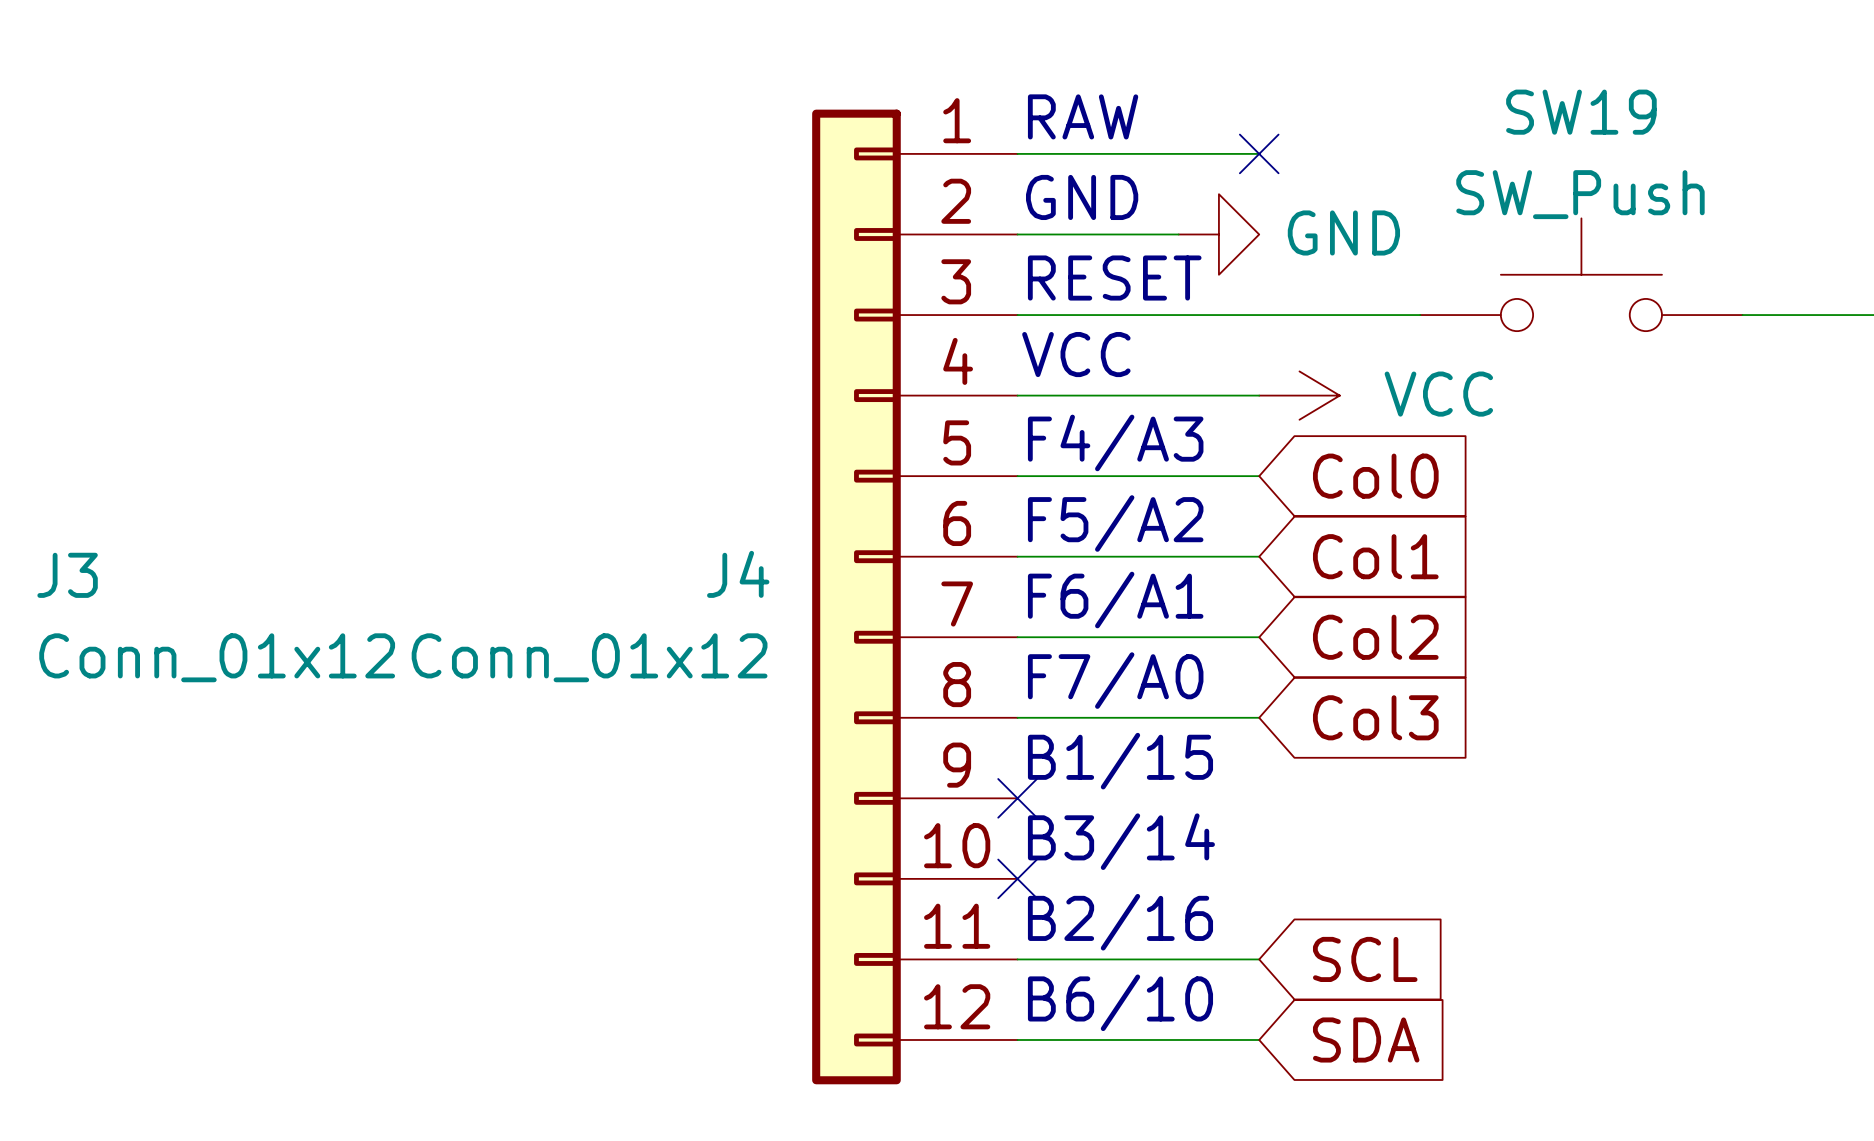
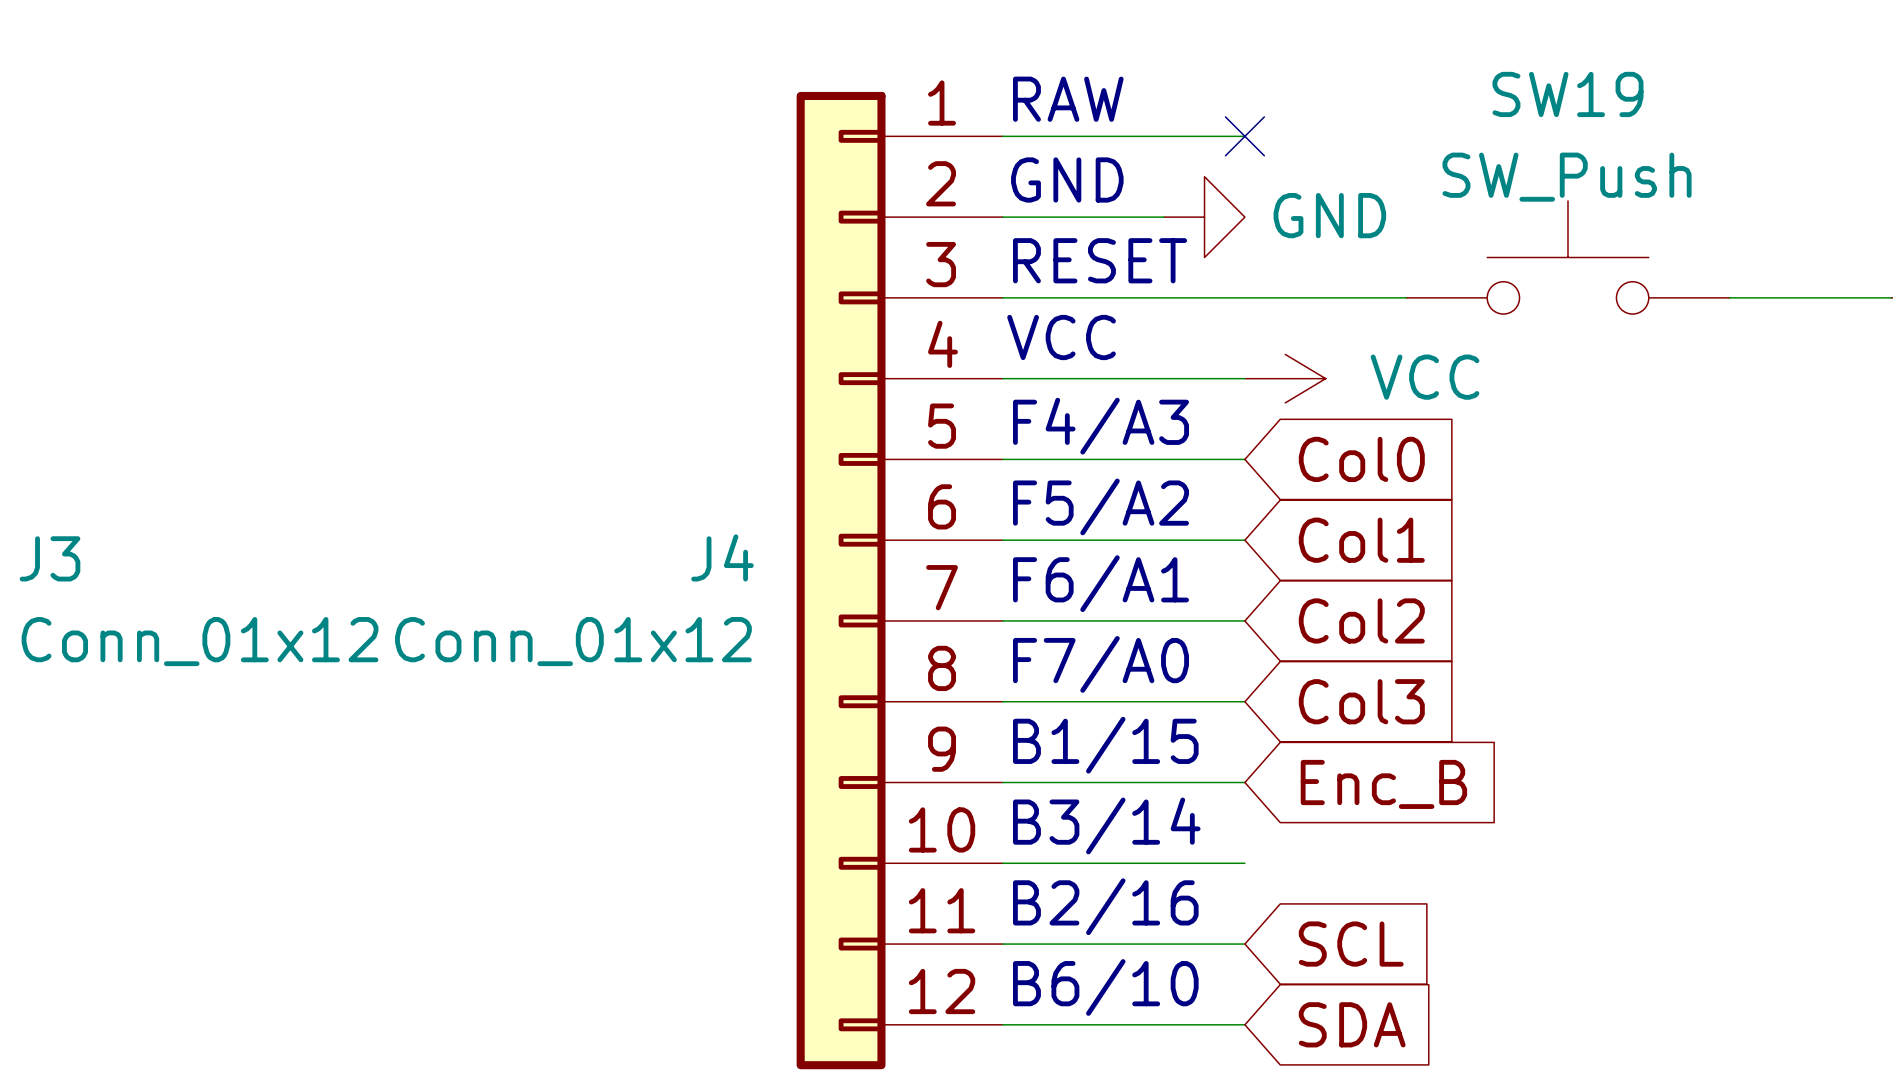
wire: none -> (1002, 782) (1244, 782)
no-connect mark: (1017, 798) -> none
global label: none -> Enc_B (1383, 784)
wire: none -> (1002, 863) (1244, 863)
no-connect mark: (1017, 878) -> none

